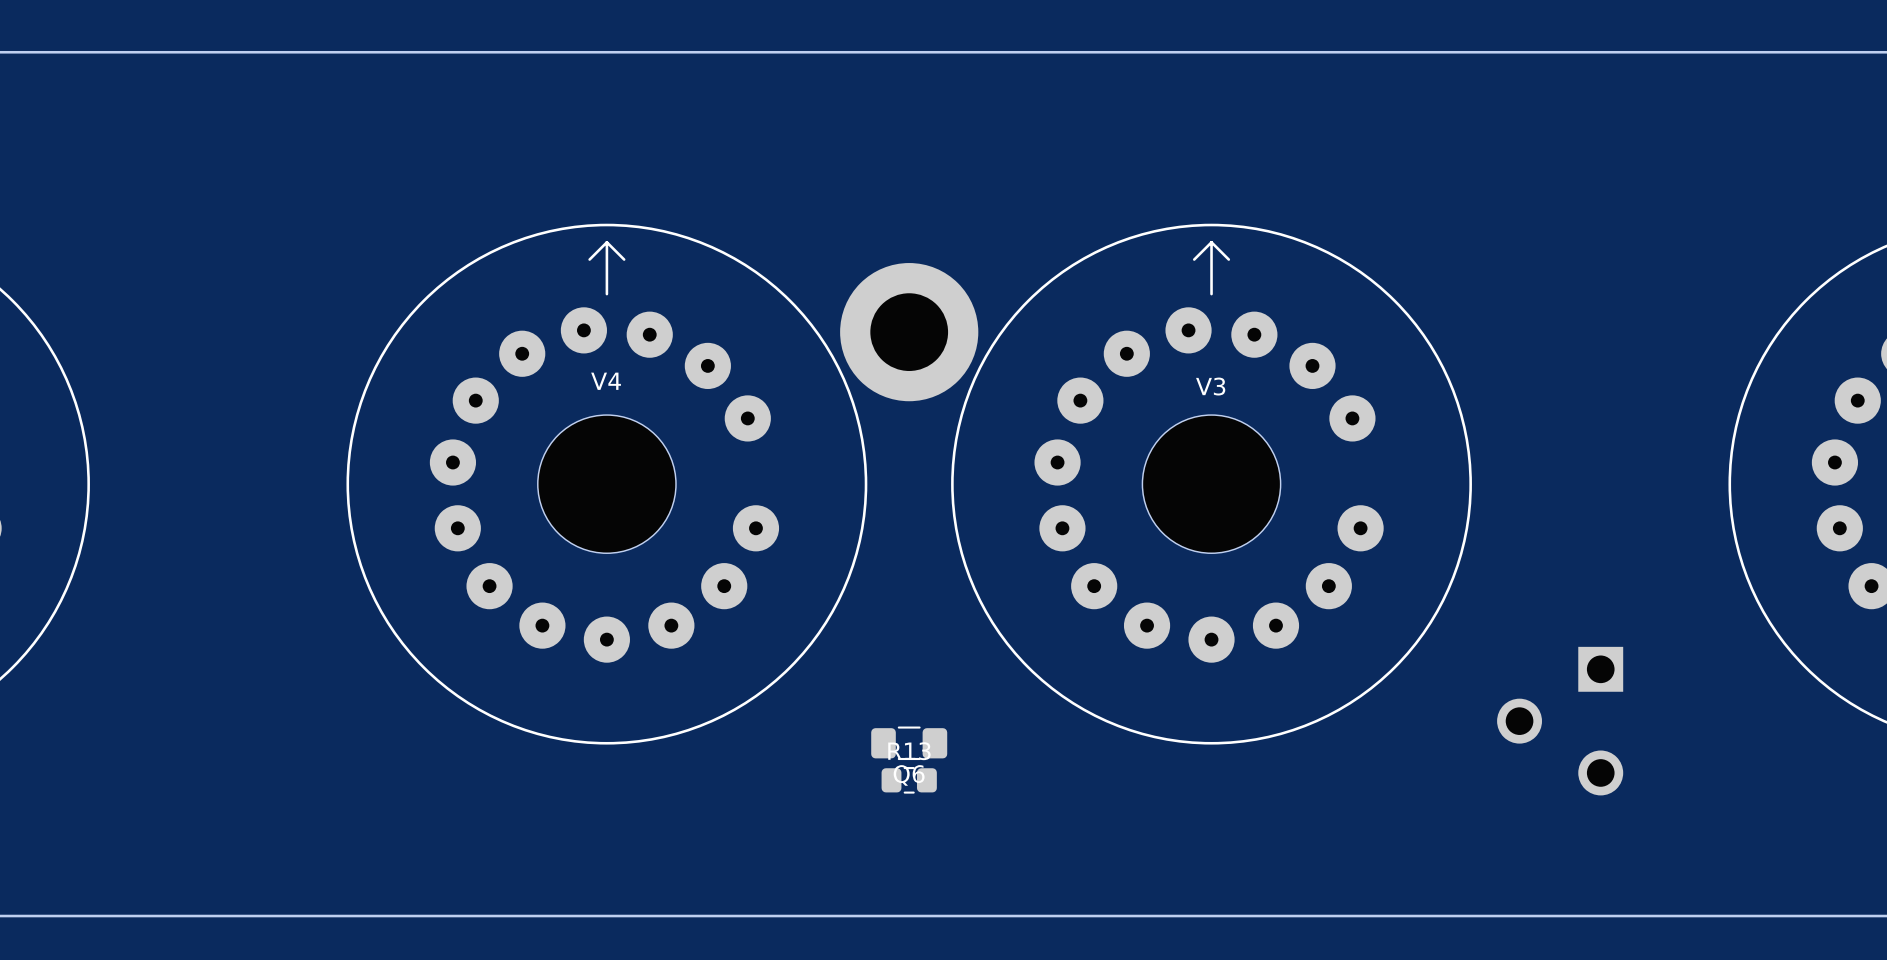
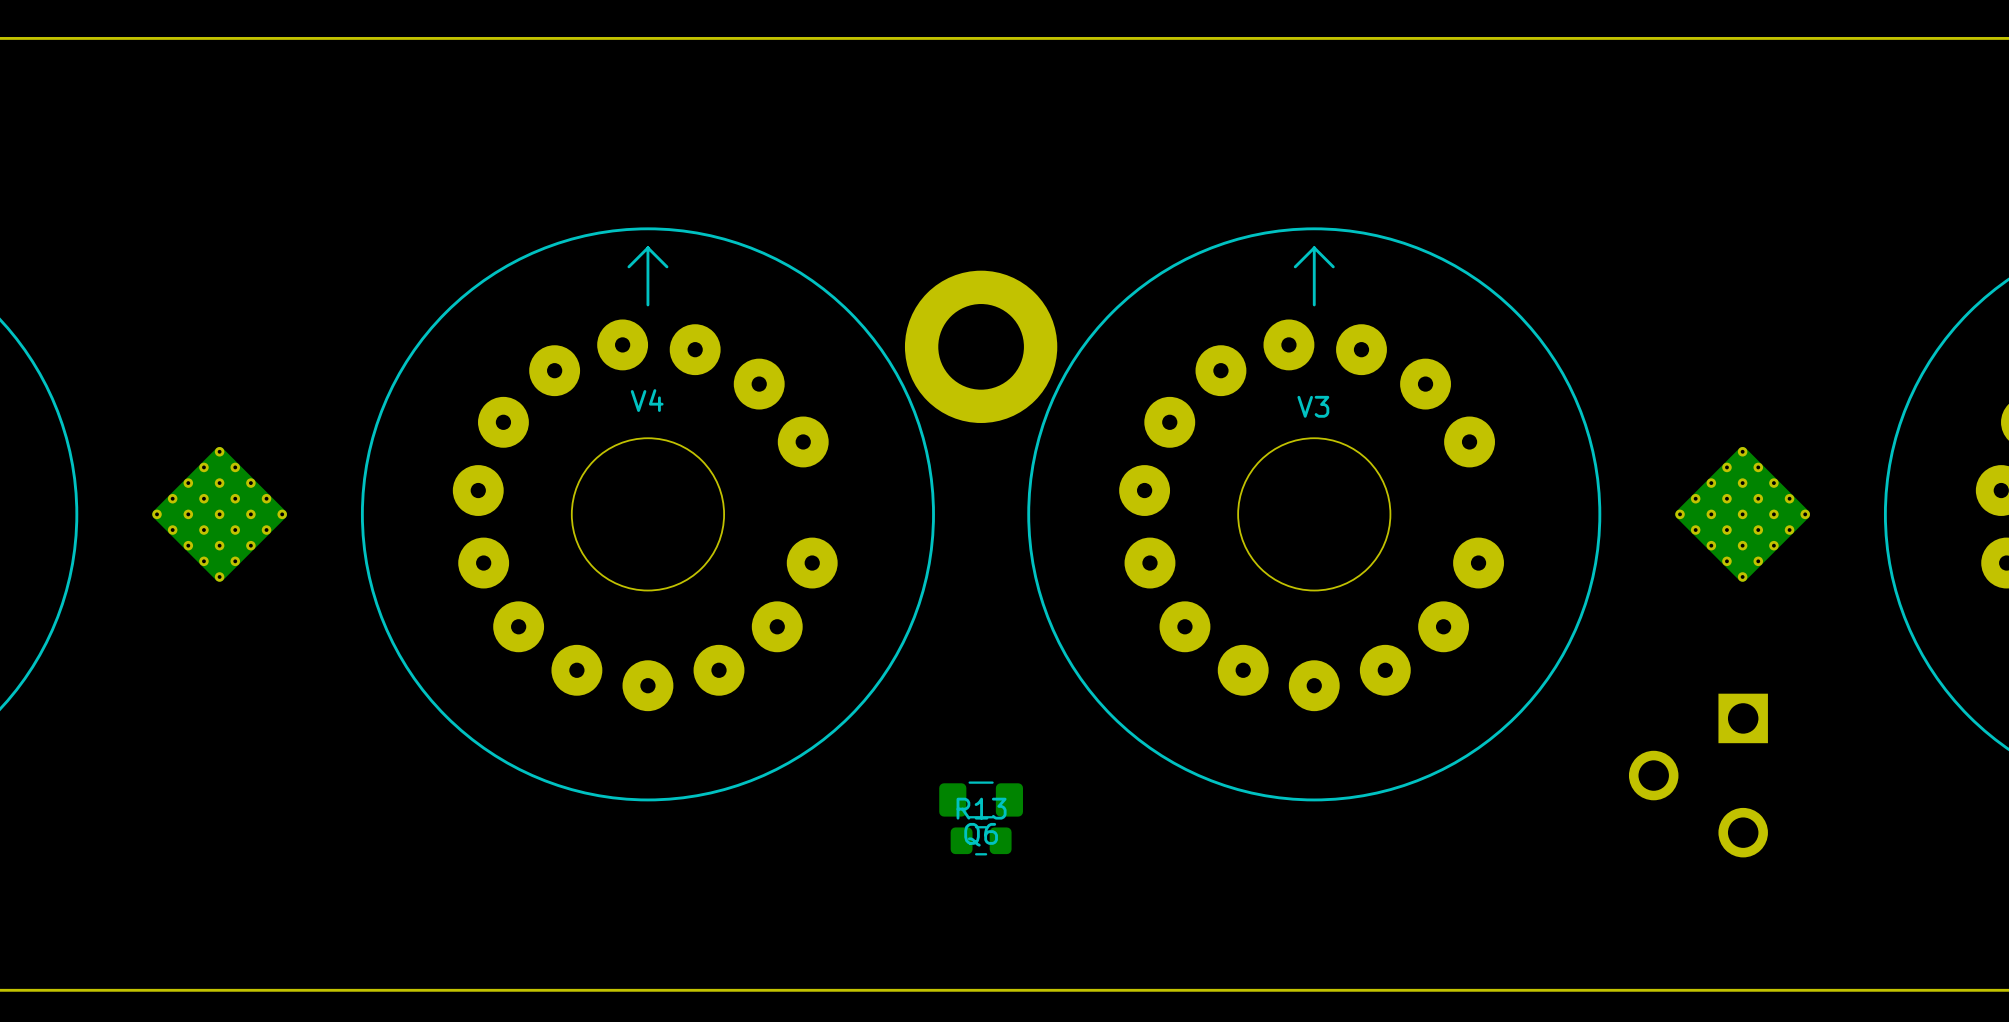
part: none -> (219, 514)
part: none -> (1742, 514)

